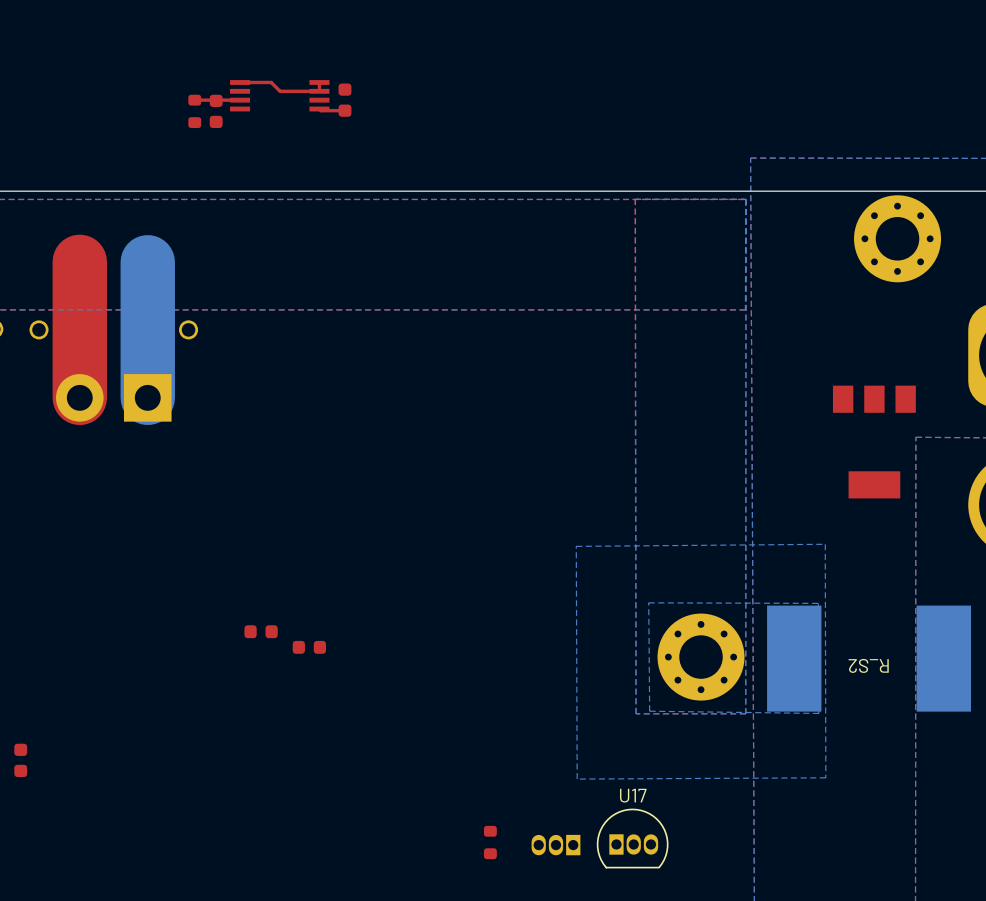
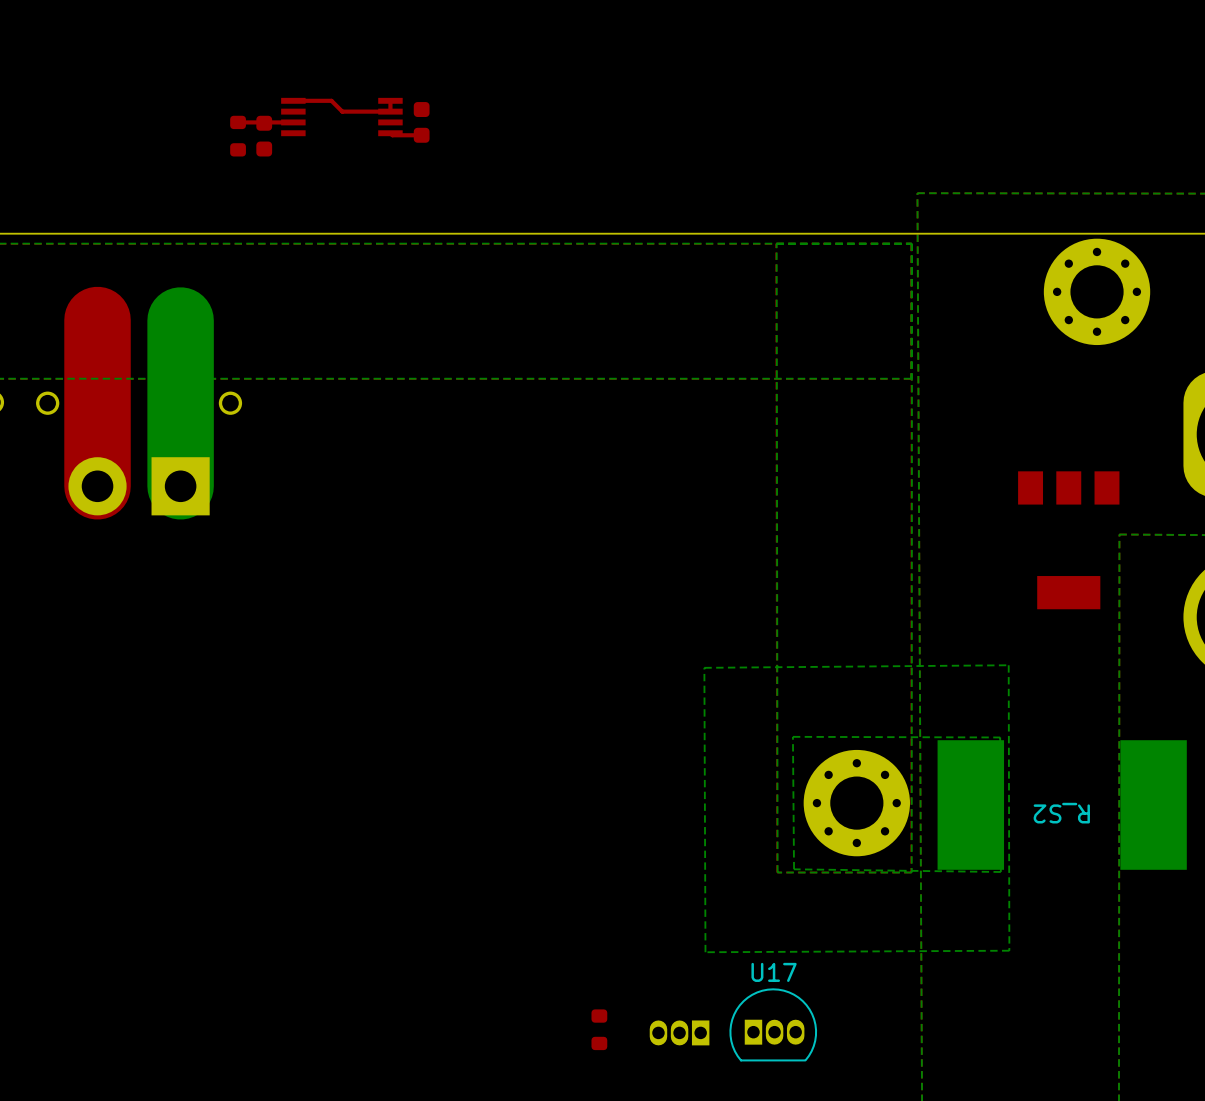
part: (261, 631) -> none
part: (309, 647) -> none
part: (20, 760) -> none

